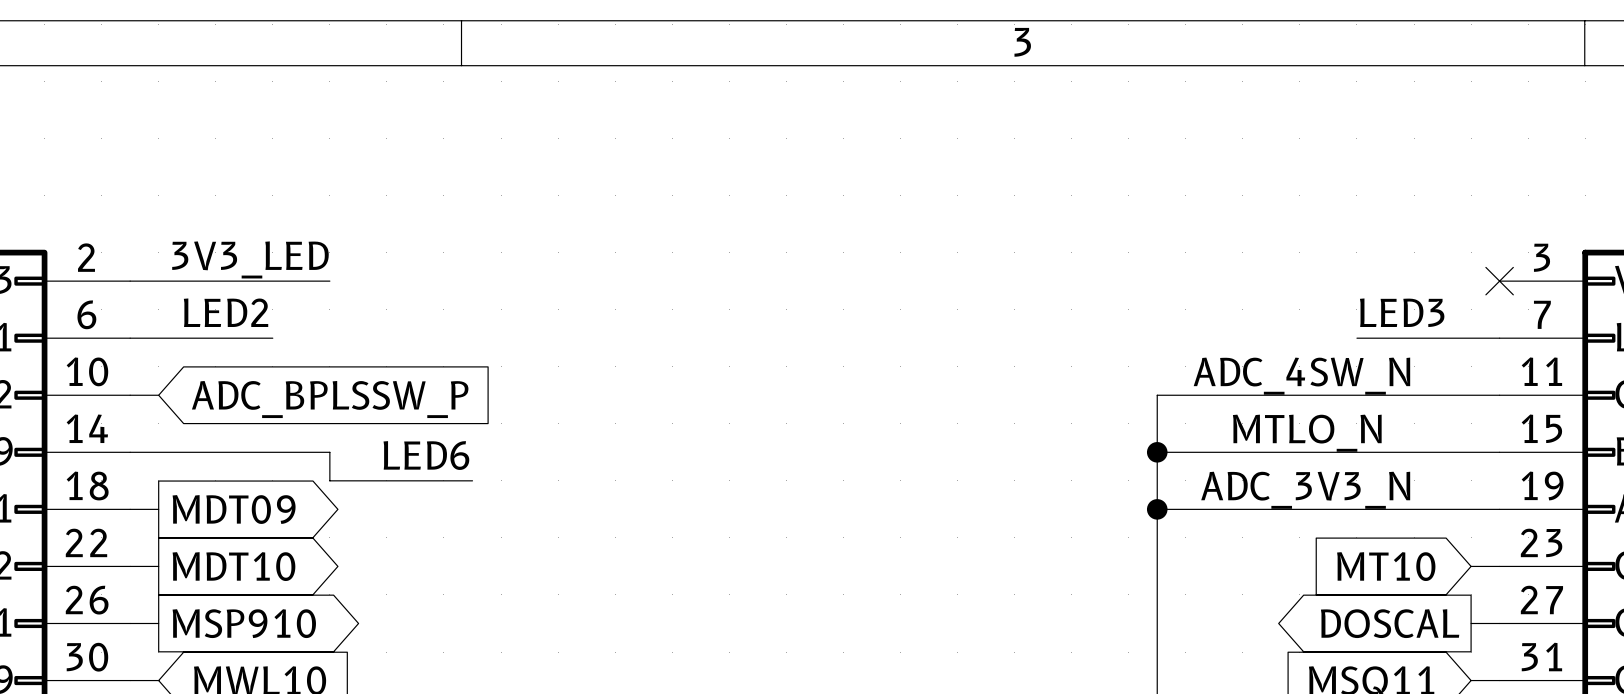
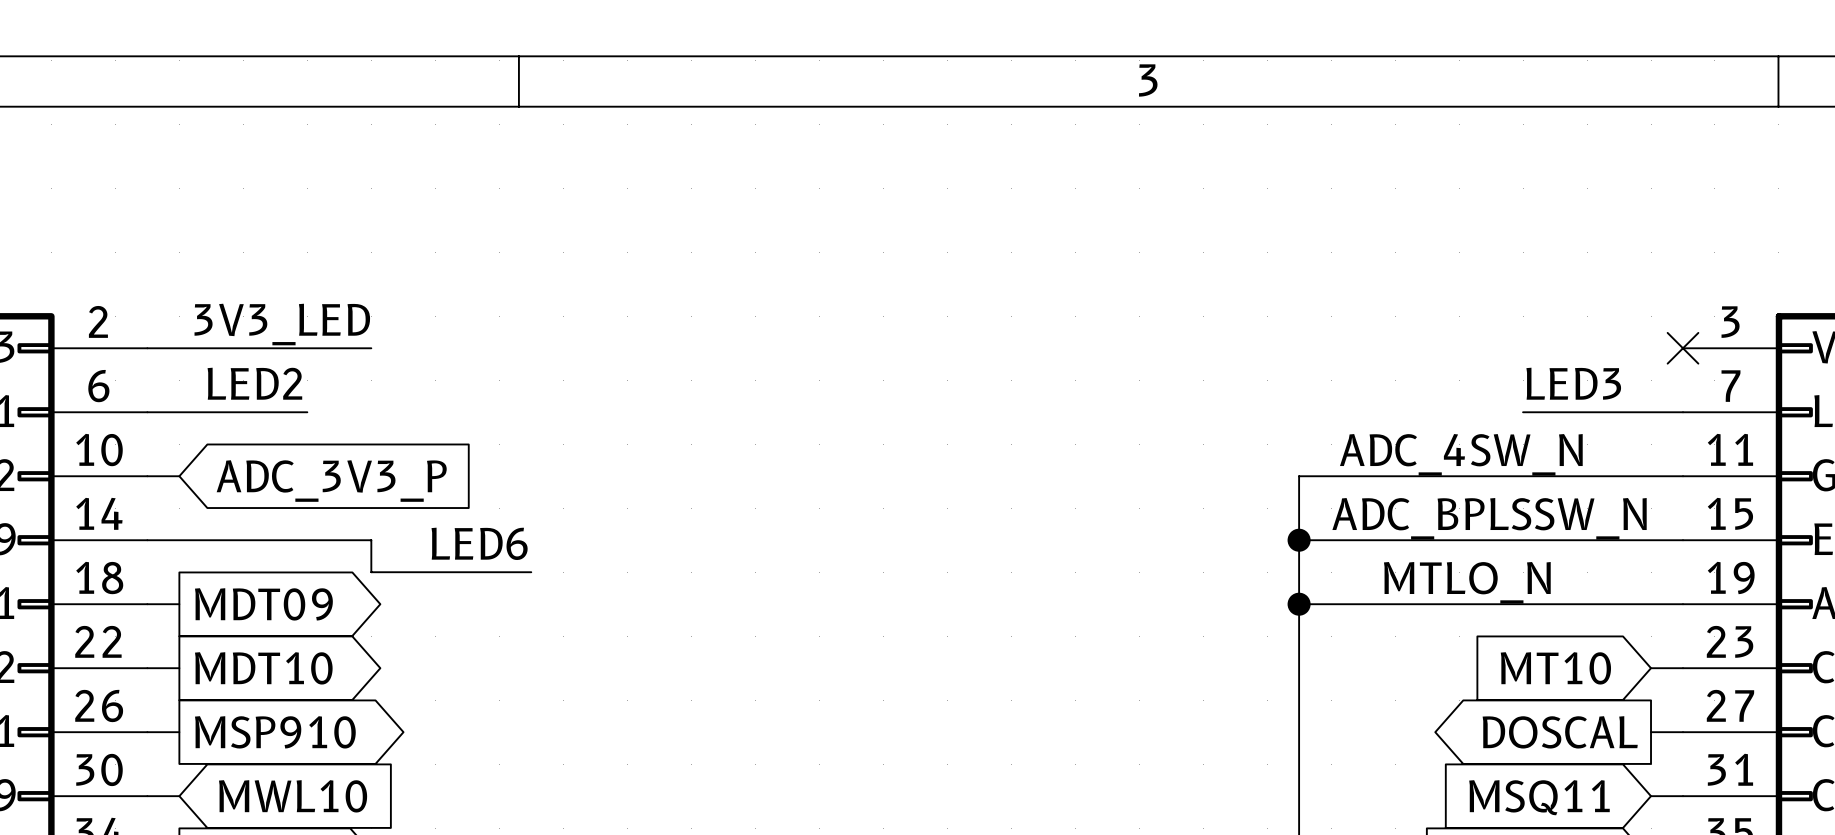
global label: ADC_BPLSSW_P (330, 399) -> ADC_3V3_P (331, 481)
text position: MTLO_N (1307, 433) -> MTLO_N (1467, 582)
text: none -> ADC_BPLSSW_N (1489, 518)
text: ADC_3V3_N (1305, 490) -> none

